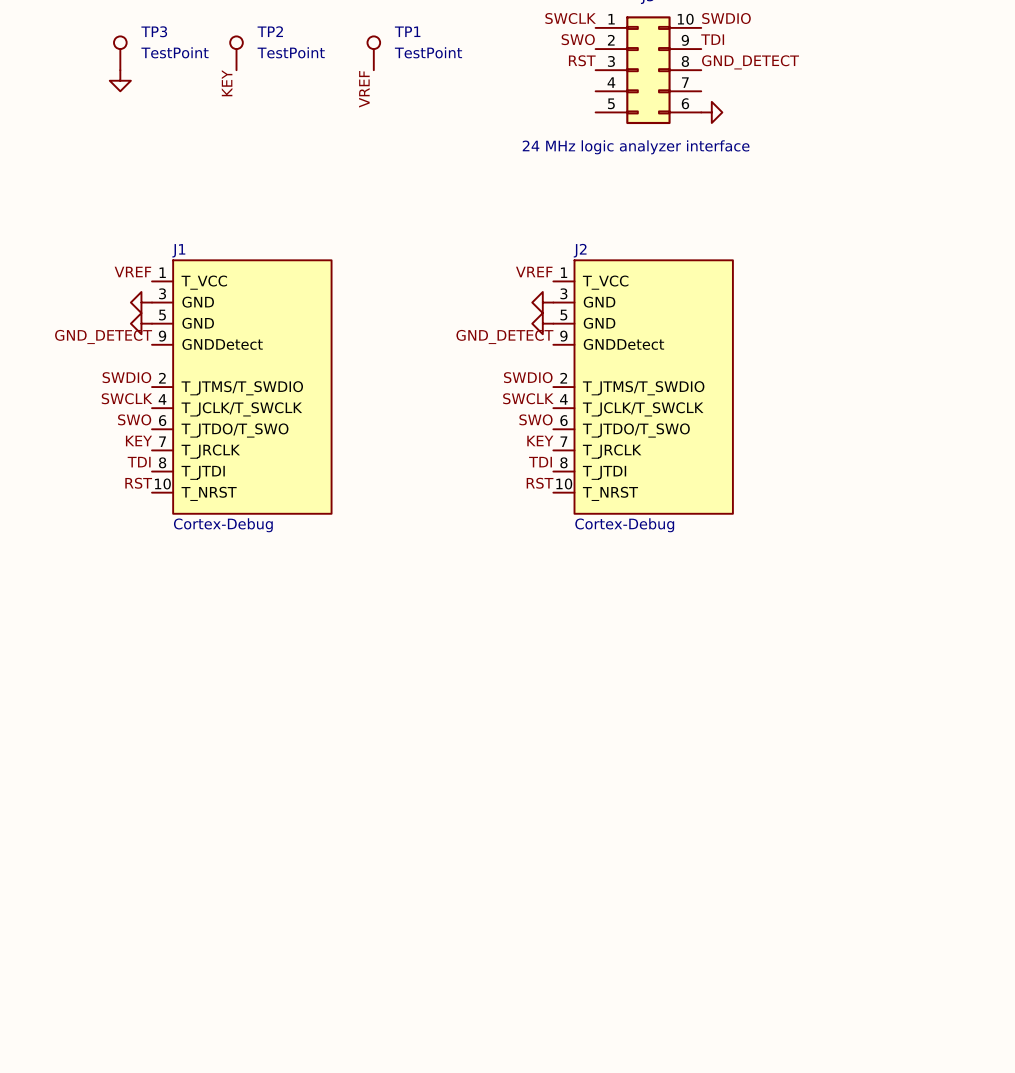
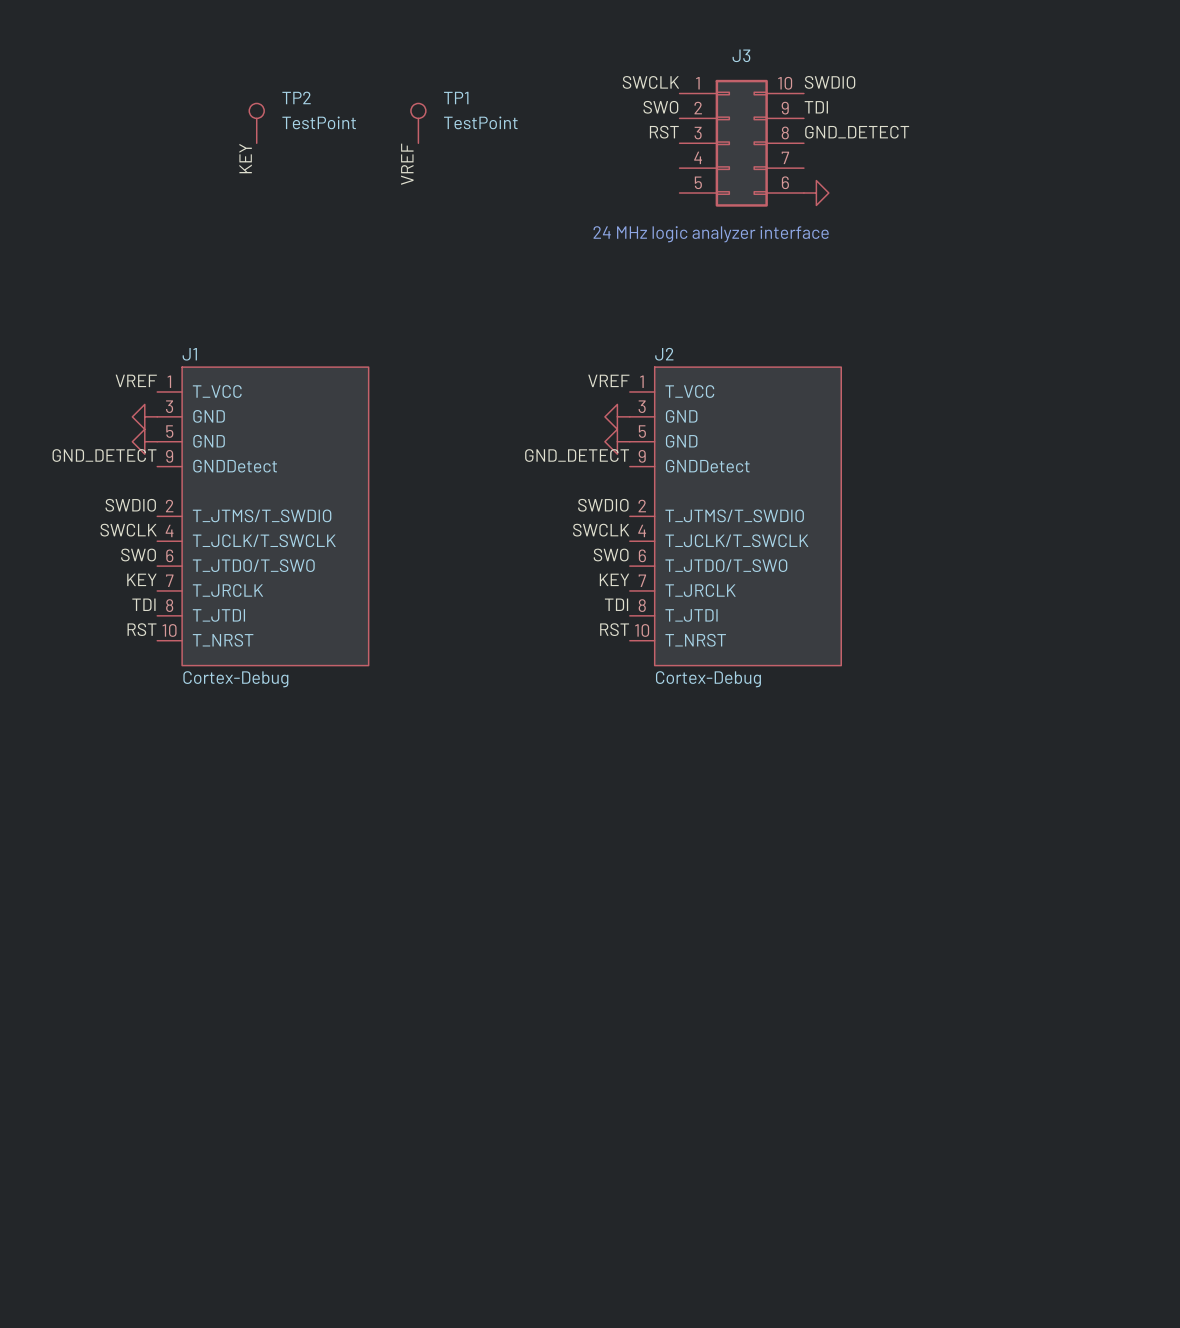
TP3: TestPoint (120, 53) -> none
power symbol: (120, 80) -> none

